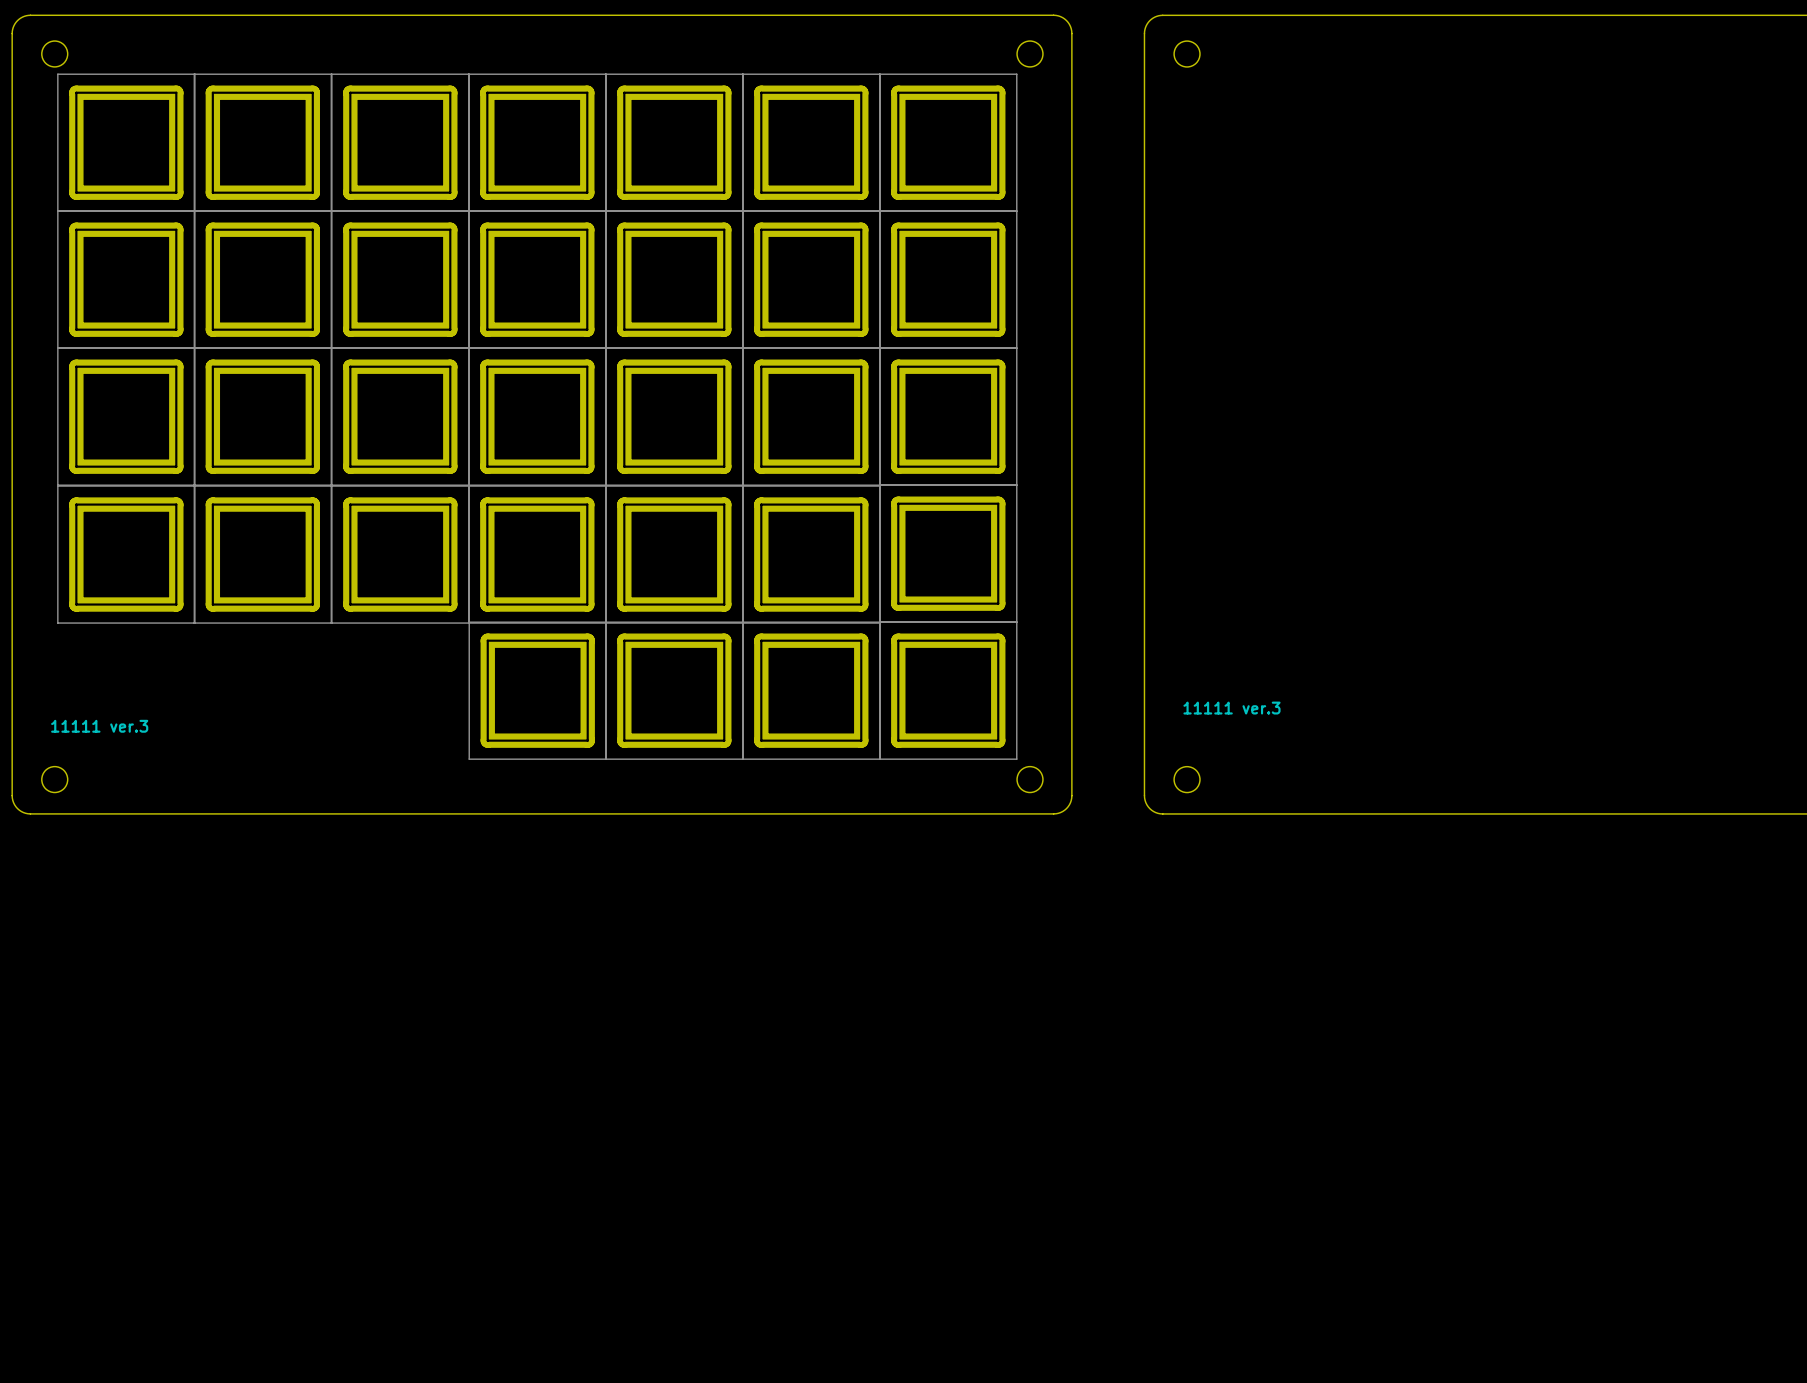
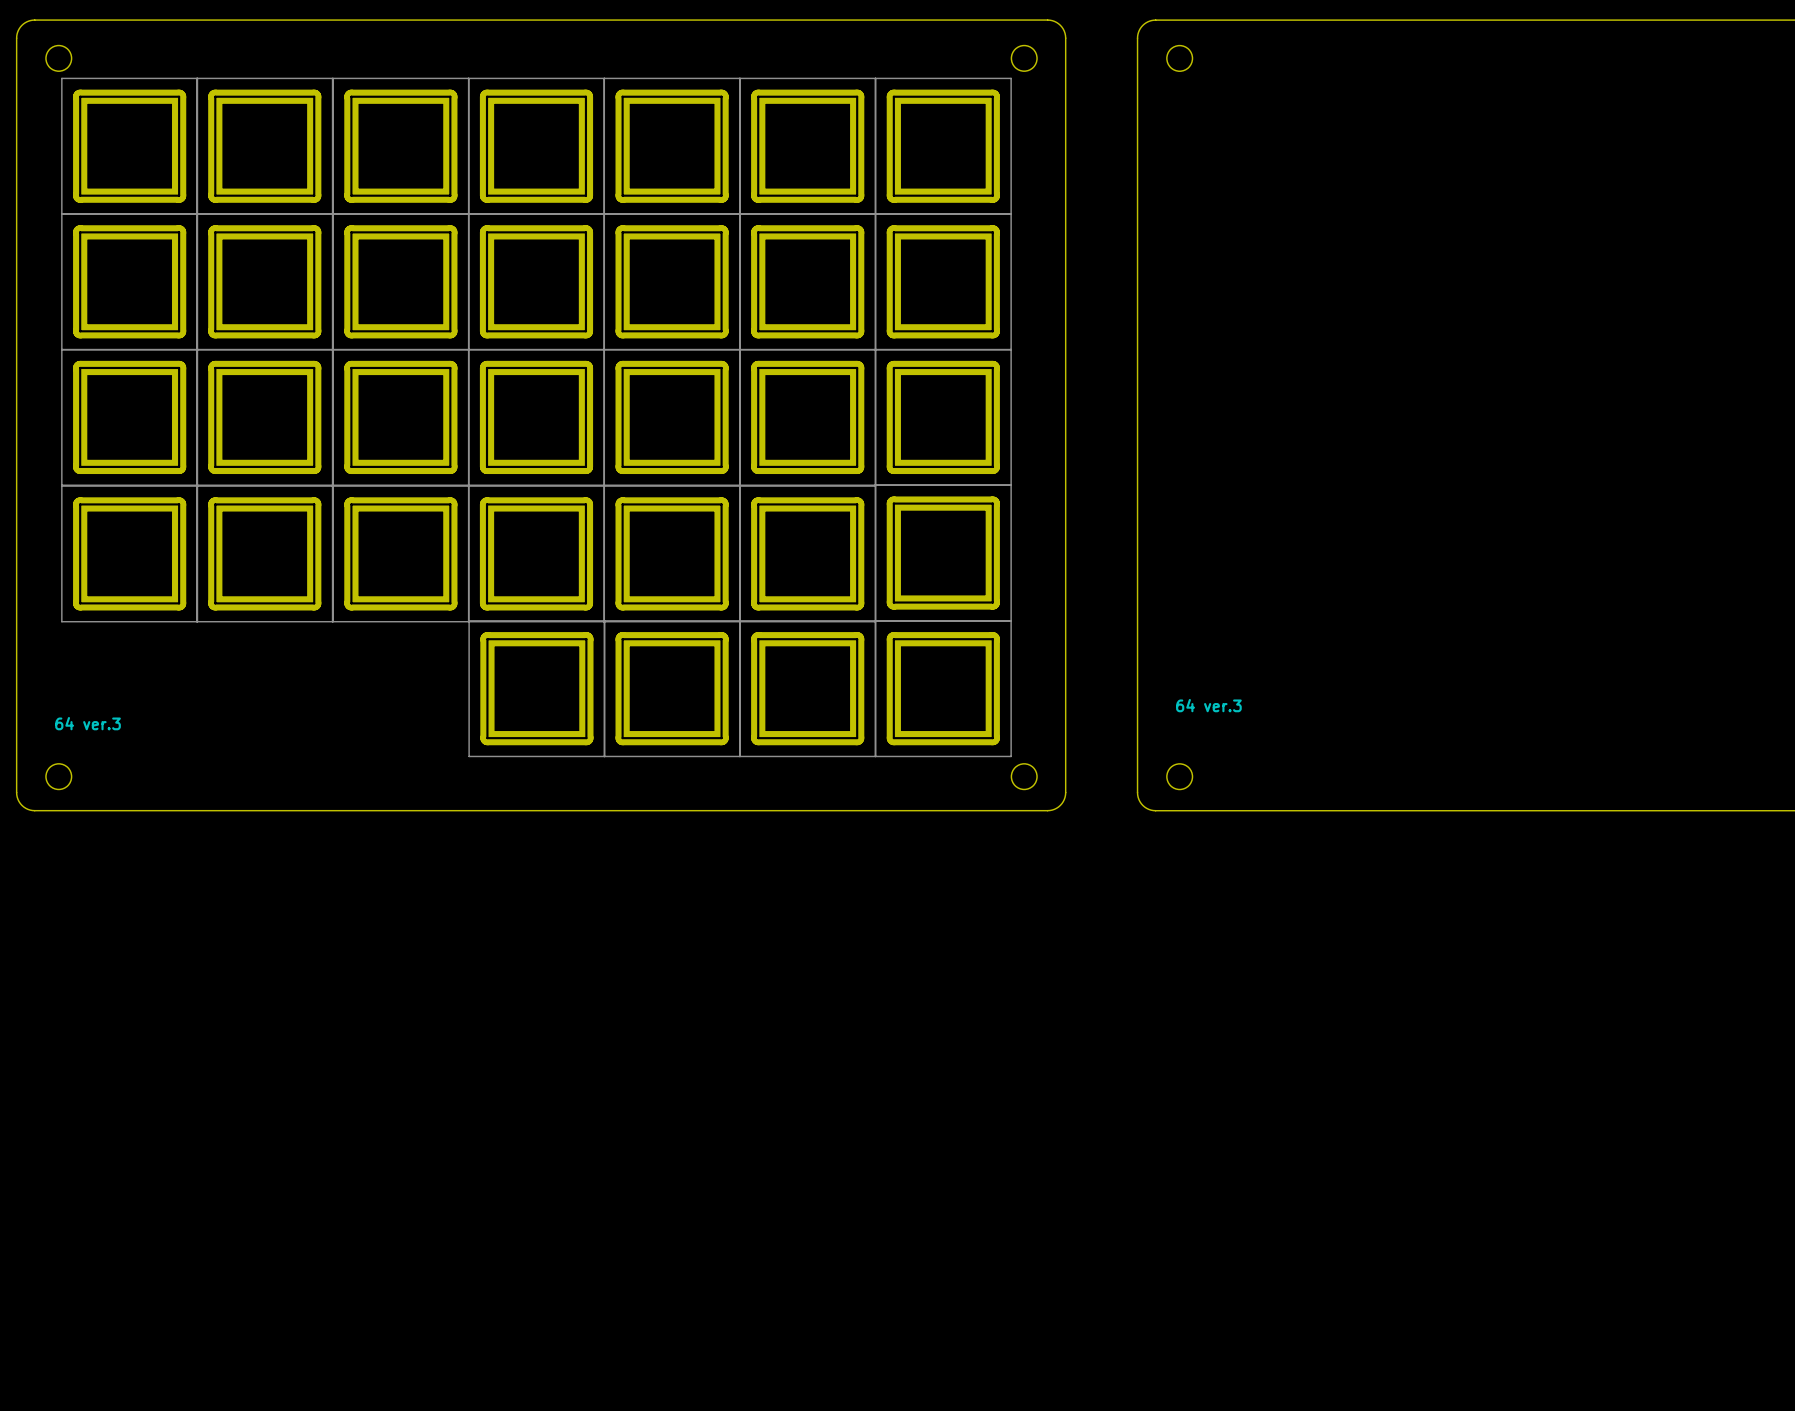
text: 11111 ver.3 (1231, 708) -> 64 ver.3 (1208, 705)
text: 11111 ver.3 (99, 726) -> 64 ver.3 (88, 723)

